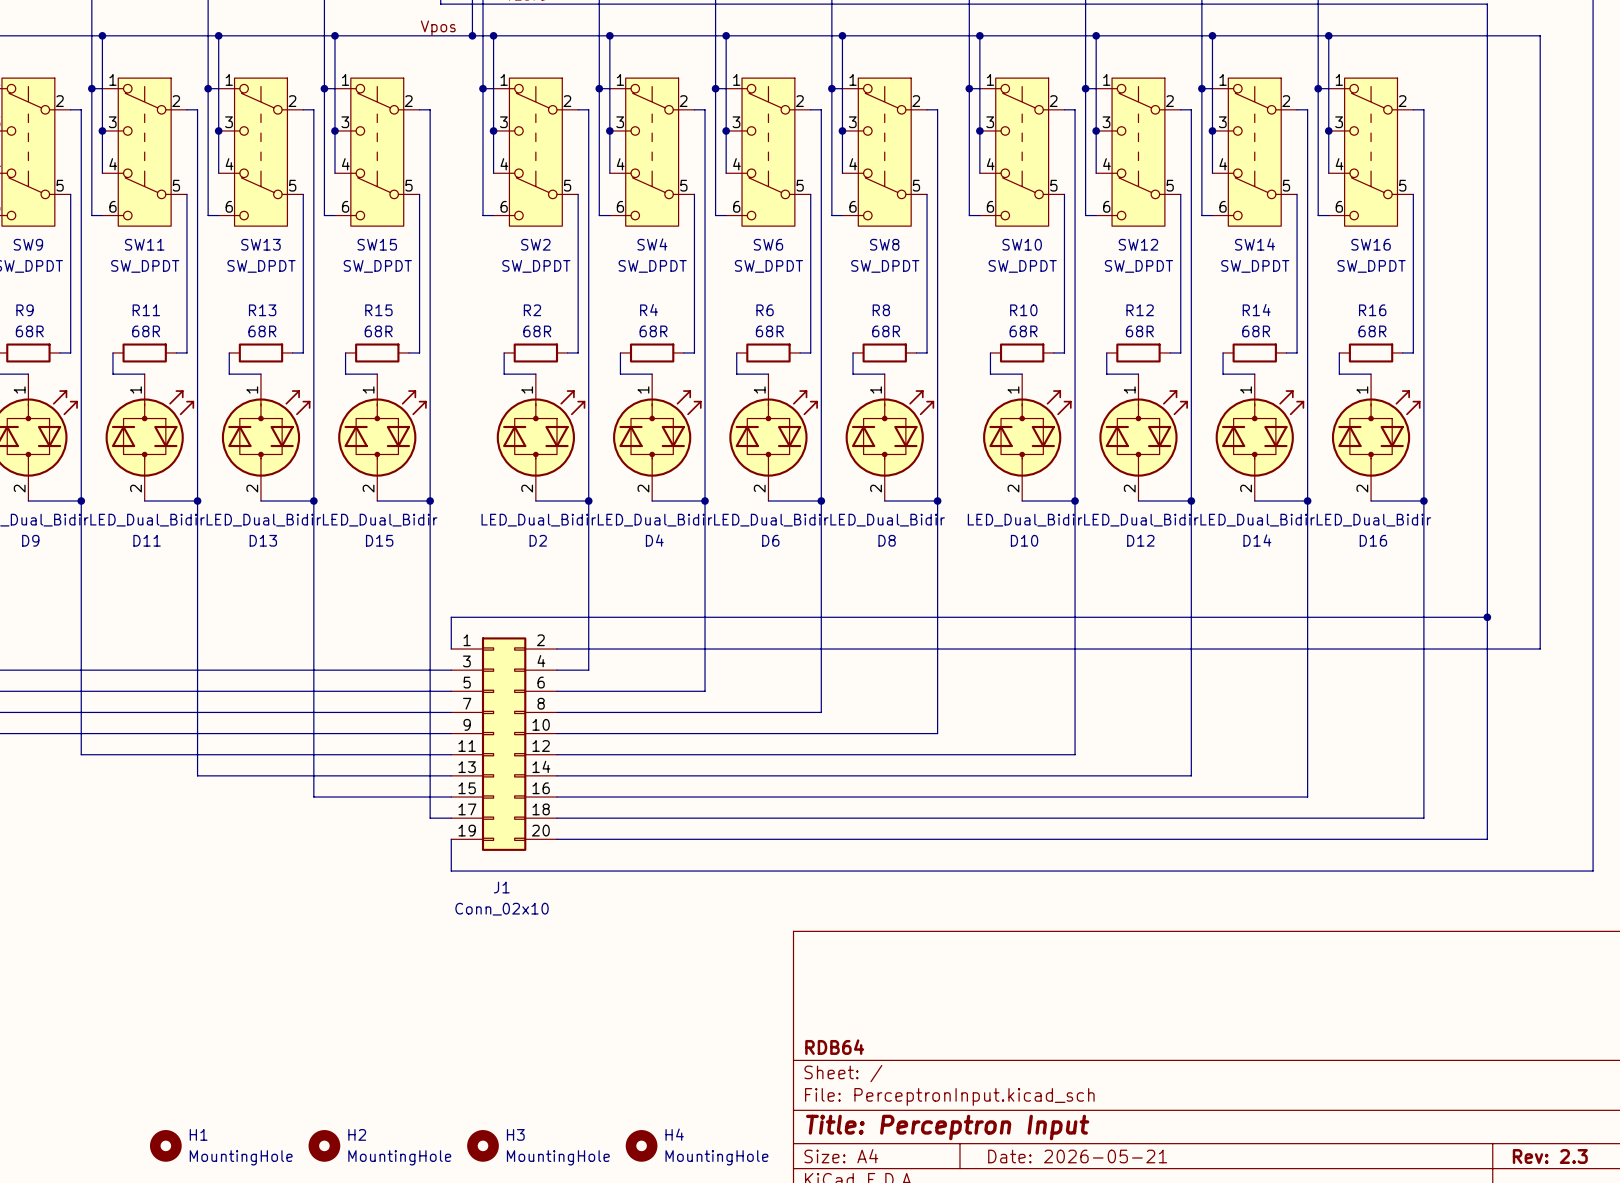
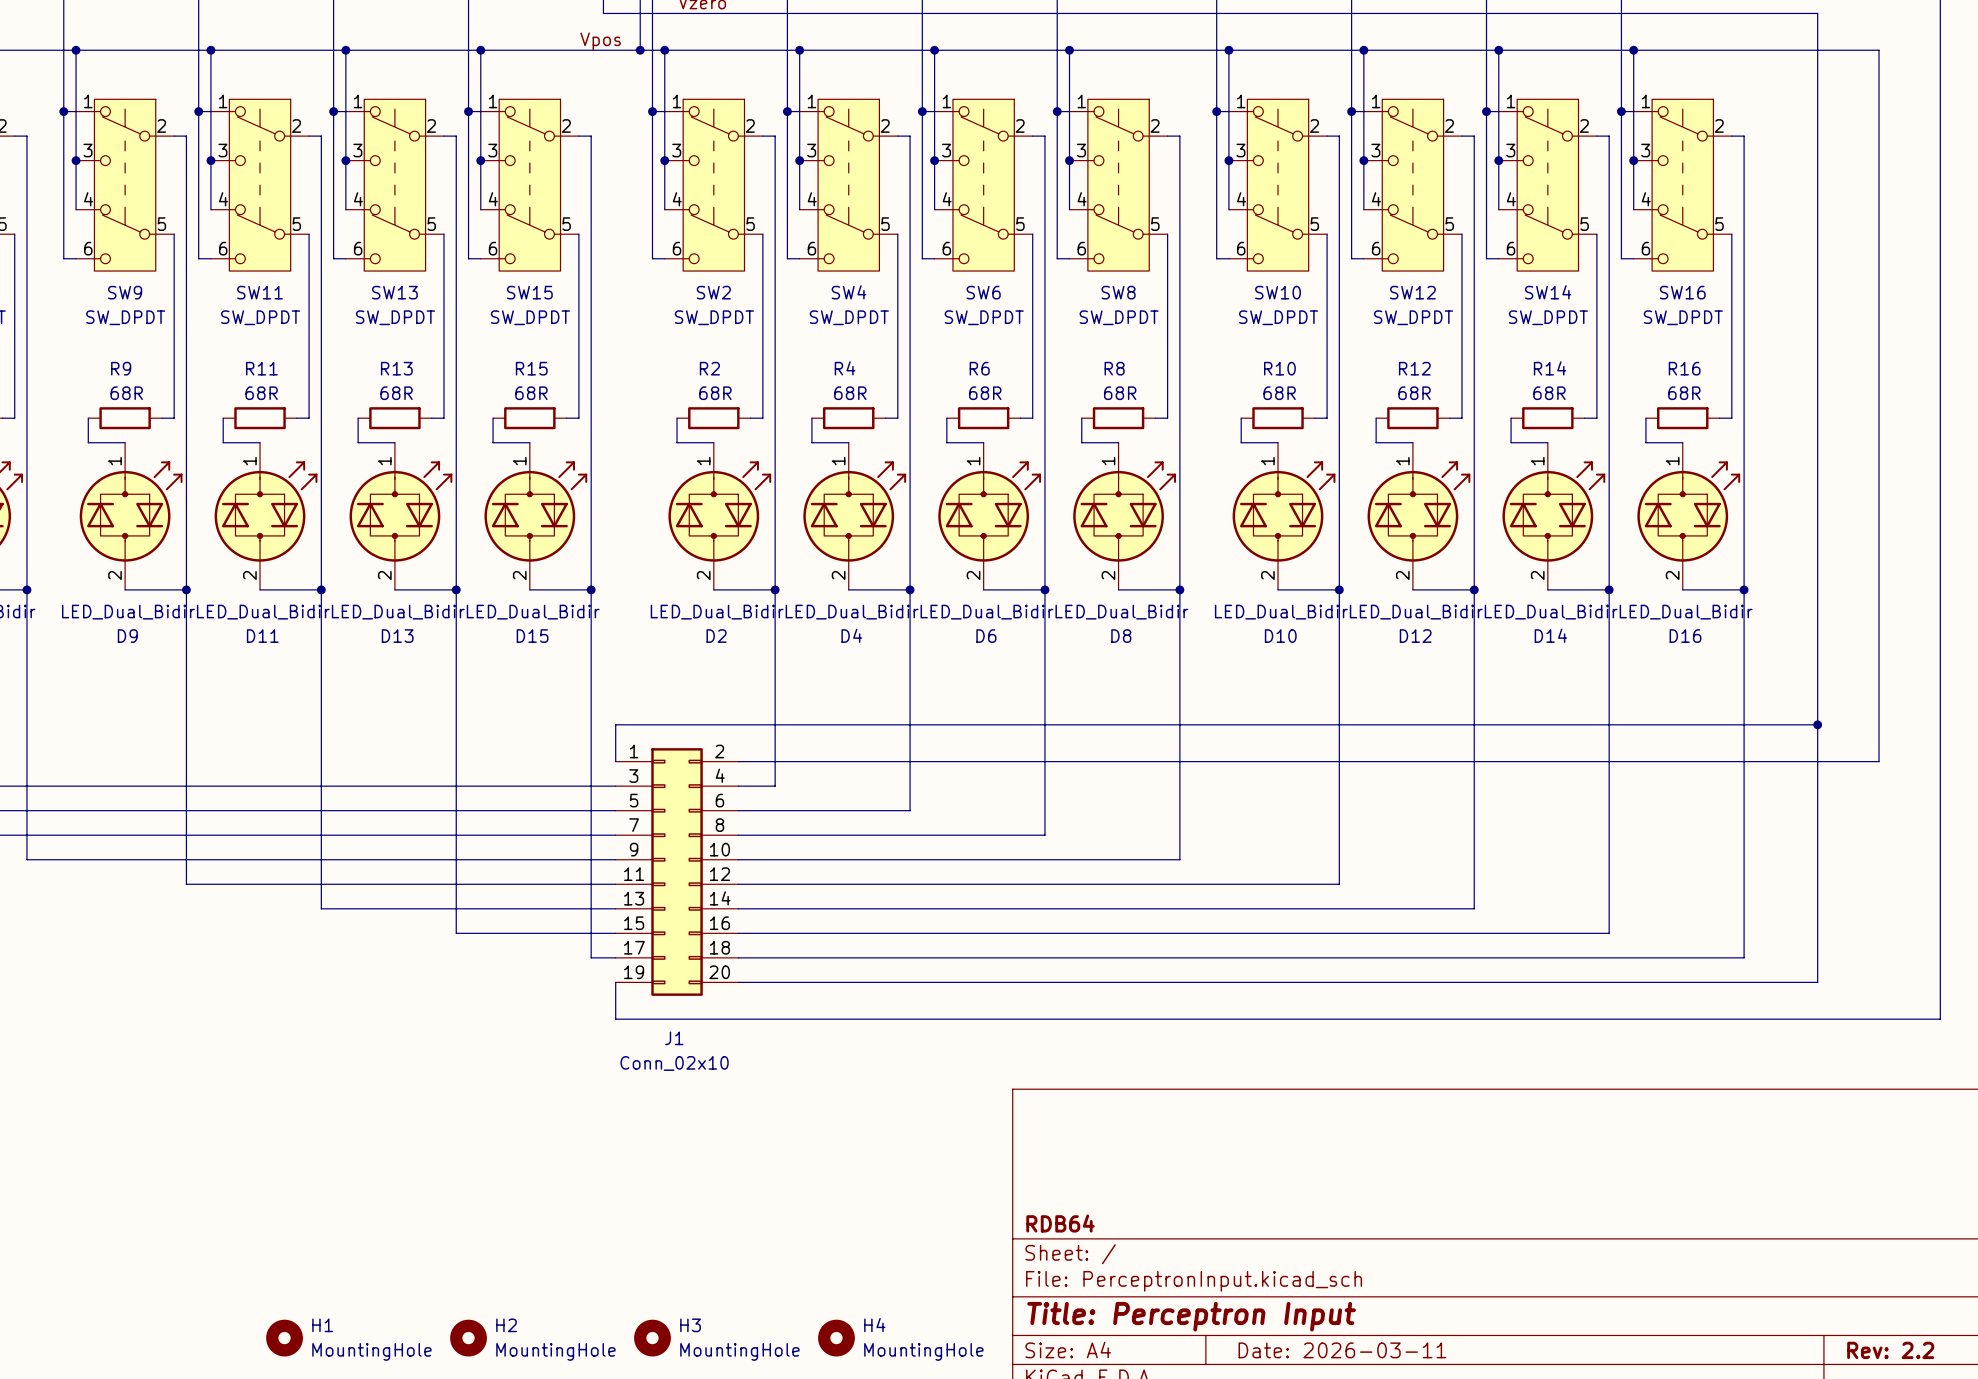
title block: Date: 2026-05-21 (1077, 1156) -> Date: 2026-03-11 (1342, 1350)
title block: Rev: 2.3 (1550, 1156) -> Rev: 2.2 (1890, 1350)

